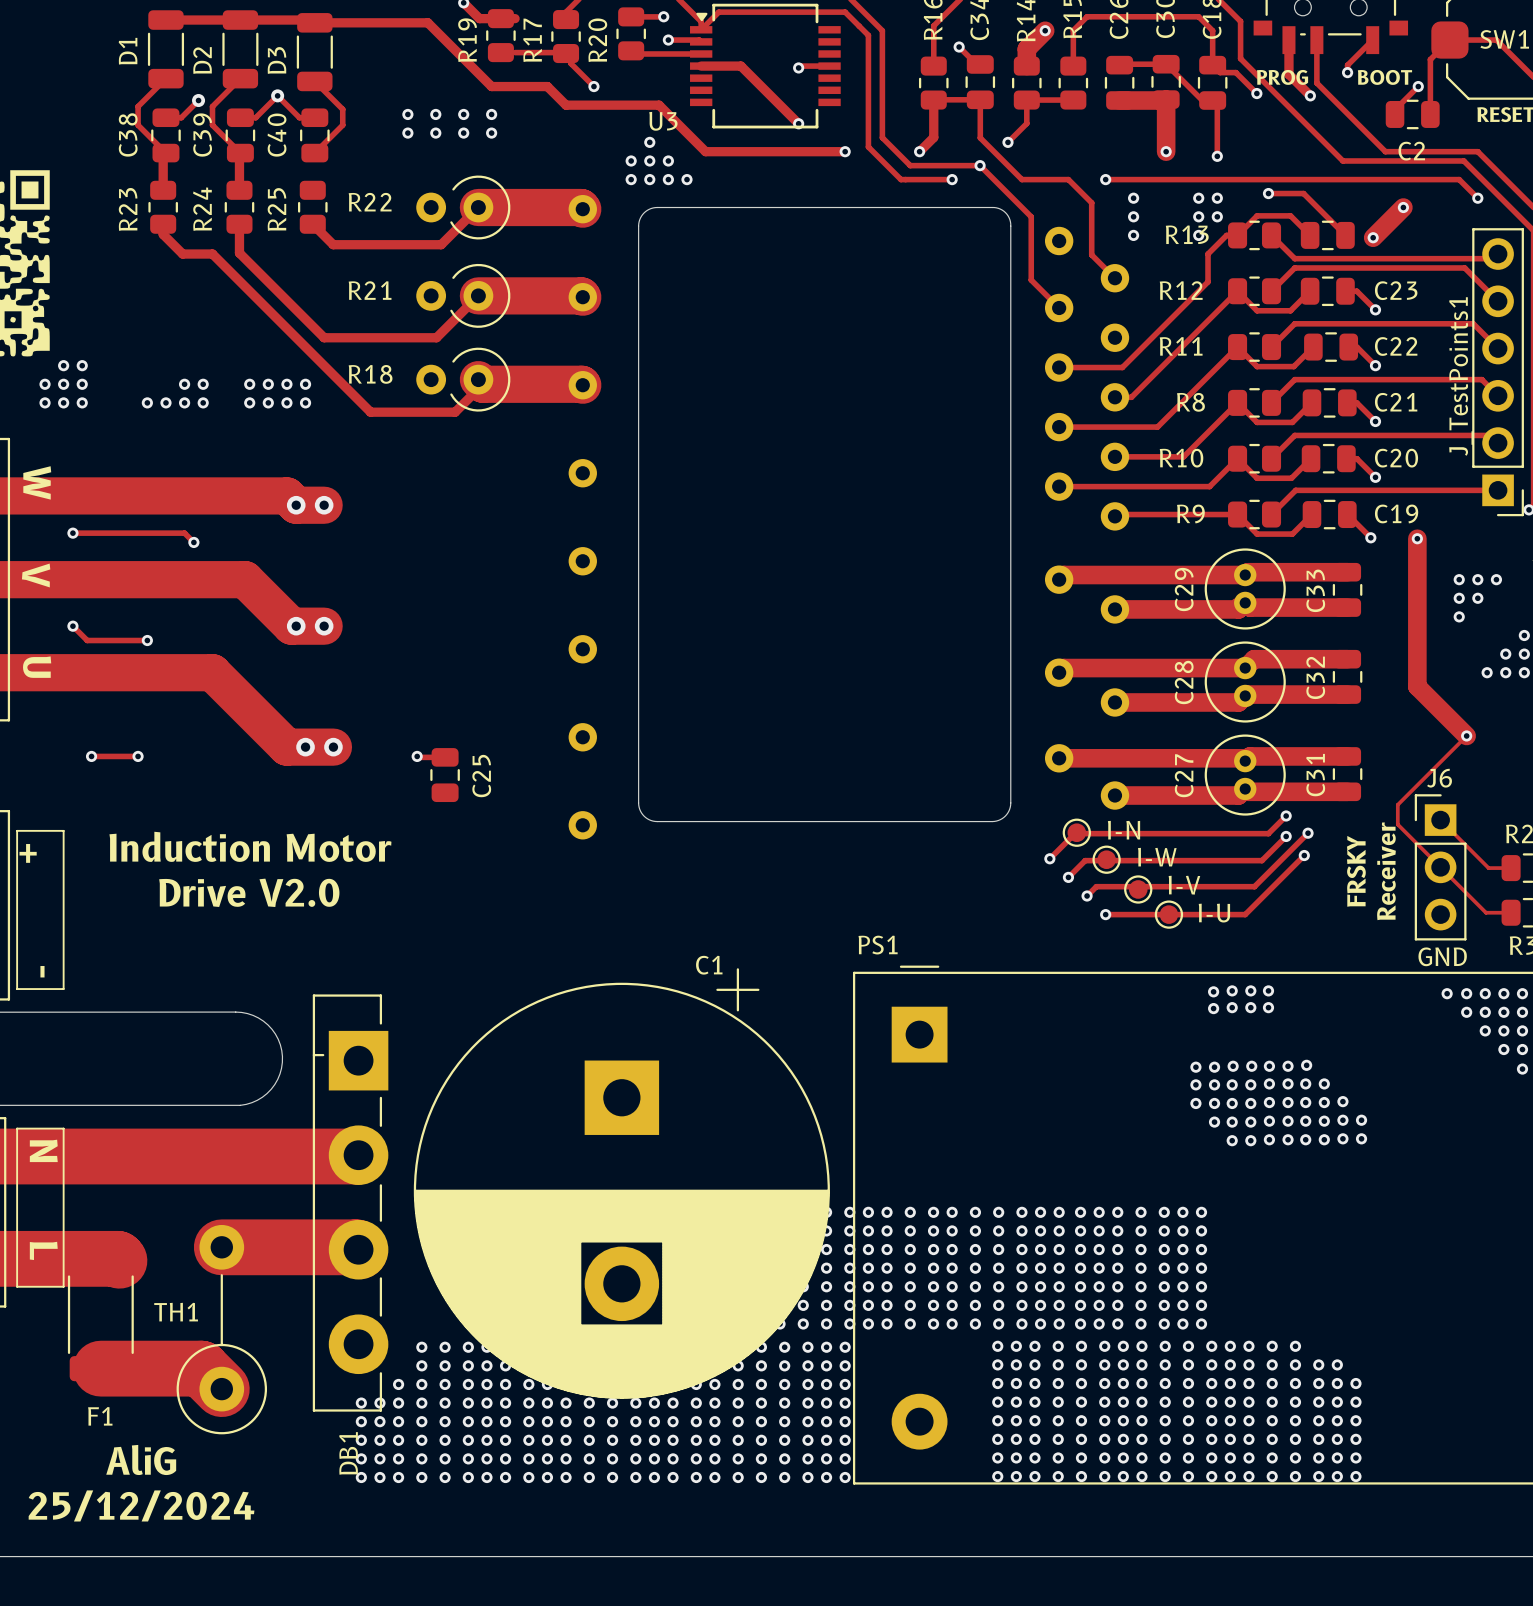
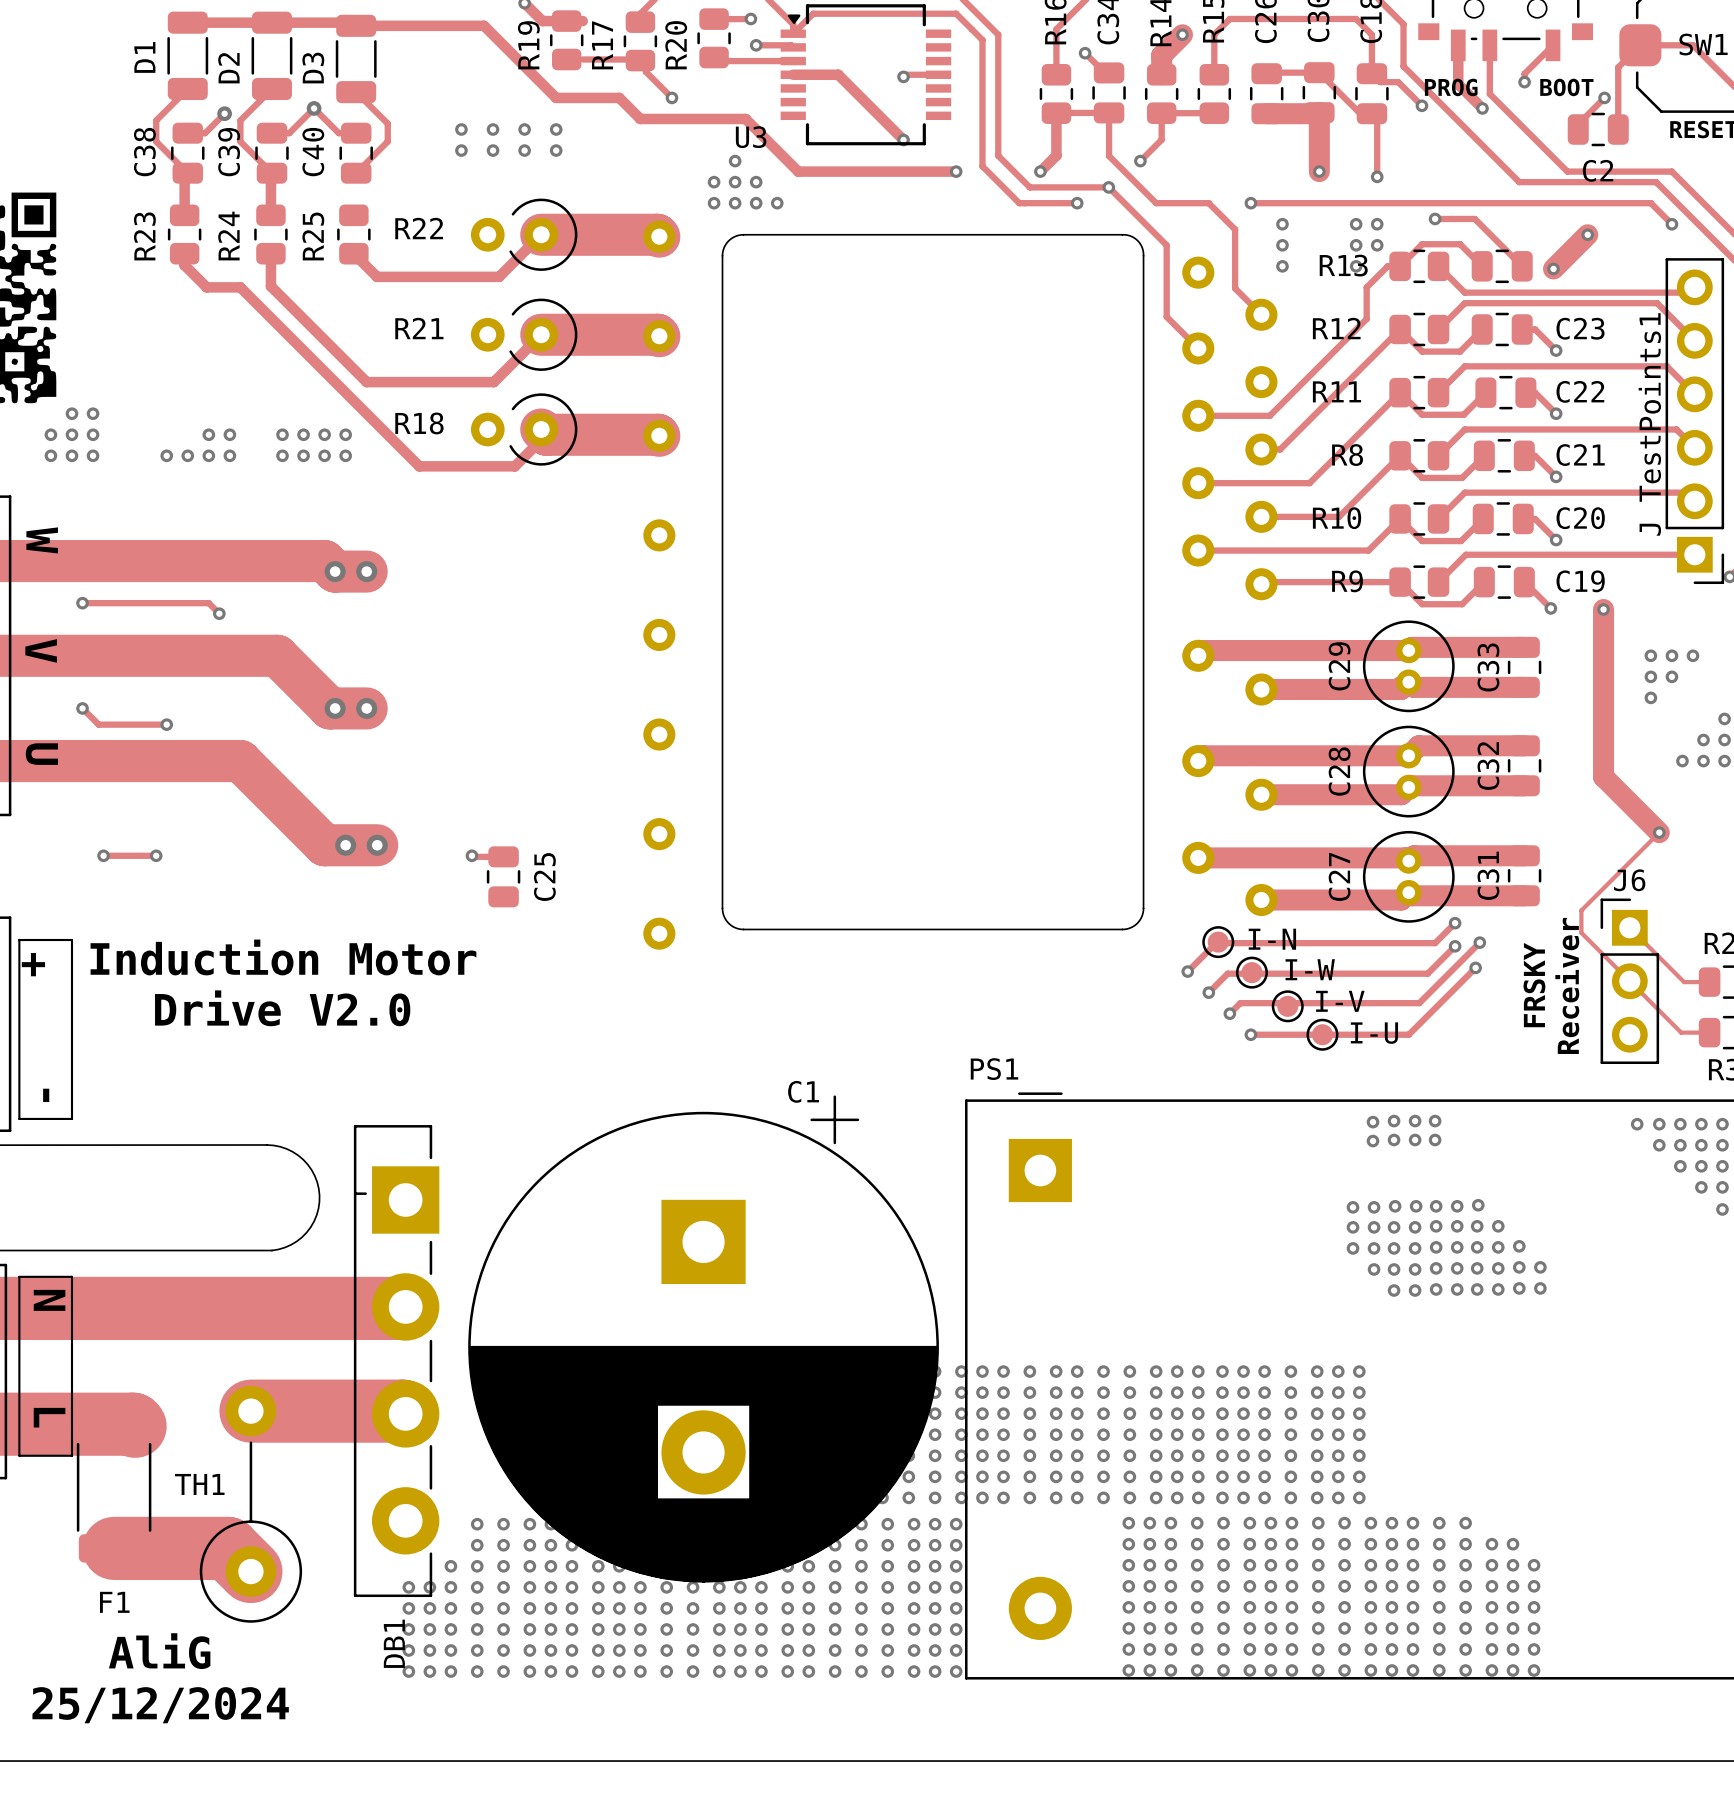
text: GND (1442, 956) -> none

